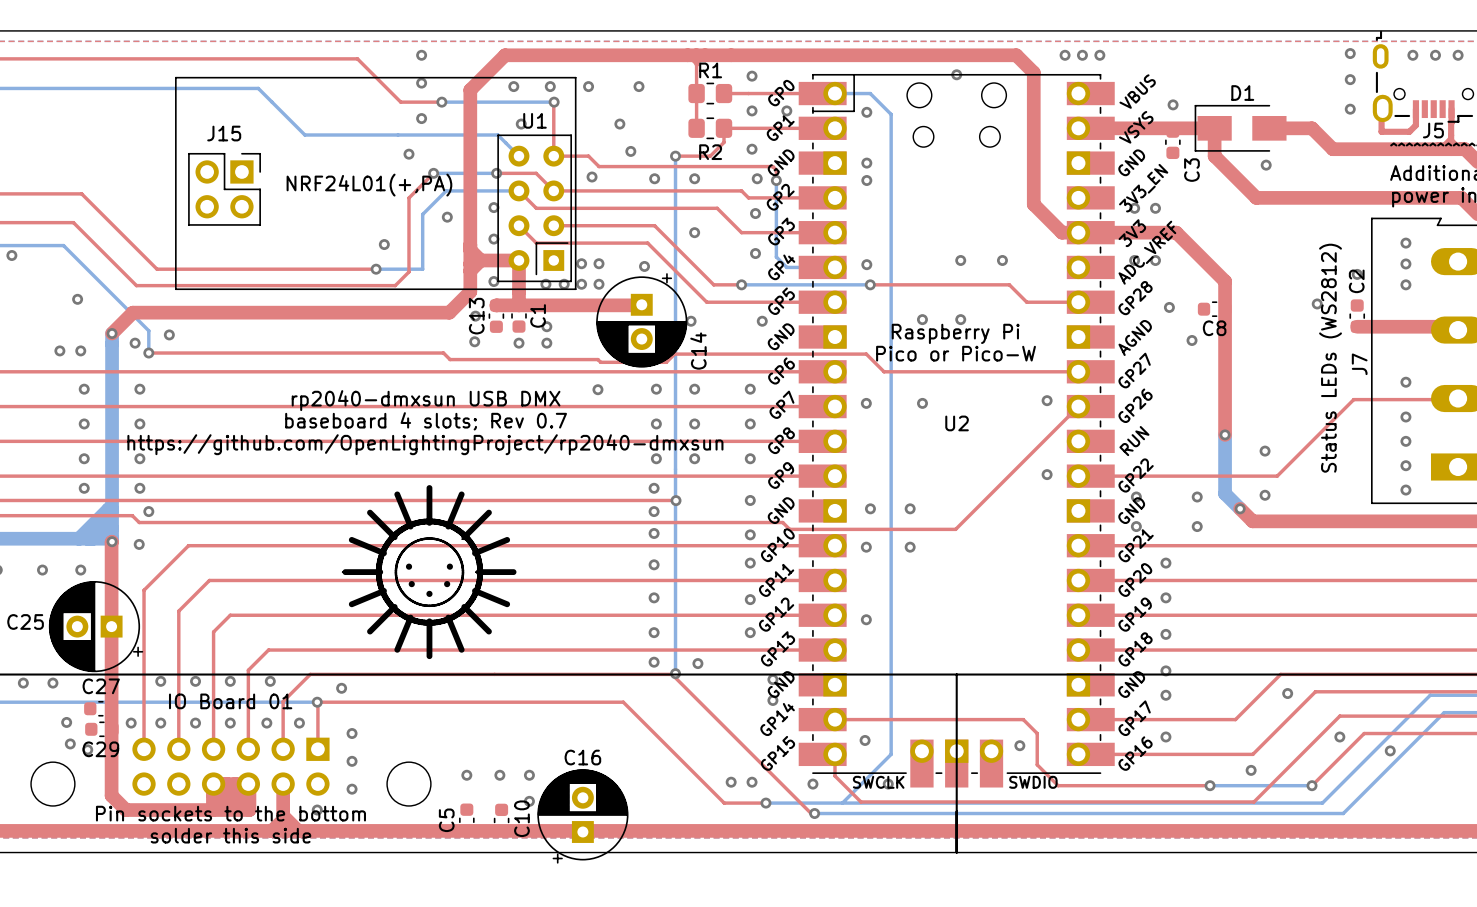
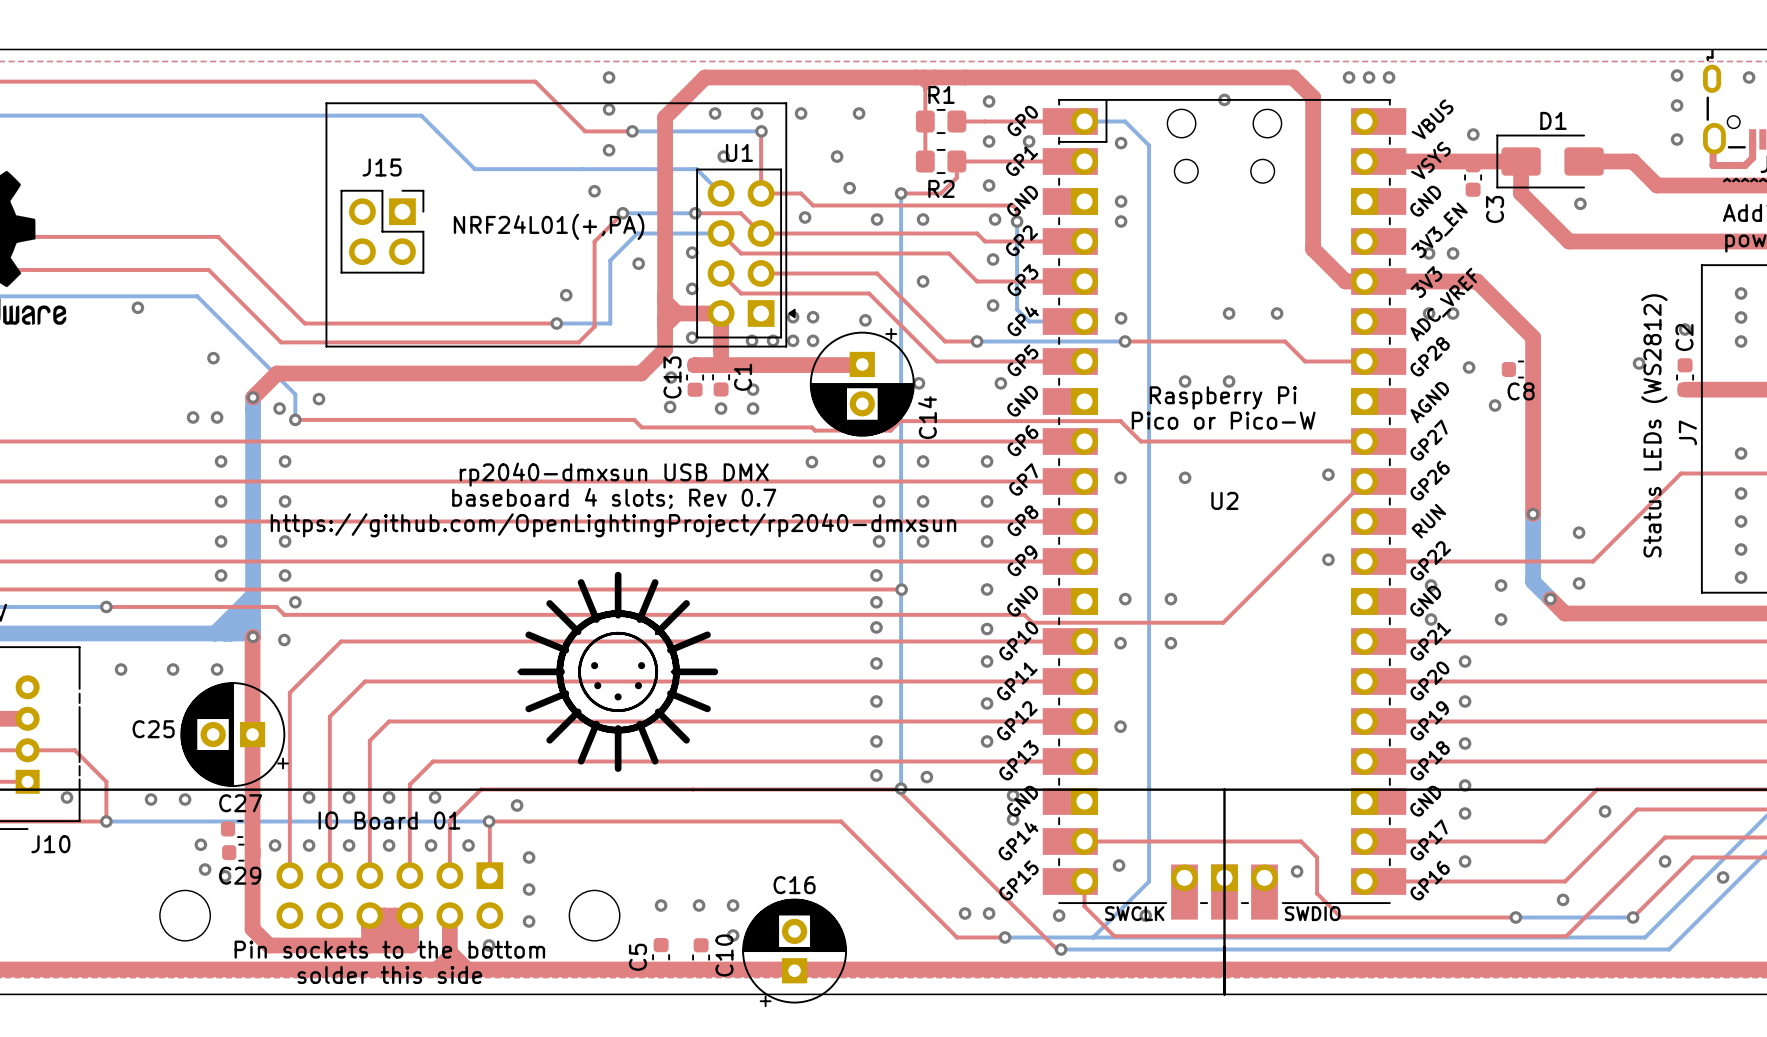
U1 footprint: [175, 76, 577, 291] -> [325, 102, 796, 348]
D1 footprint: [1194, 104, 1287, 152] -> [1496, 134, 1604, 189]

